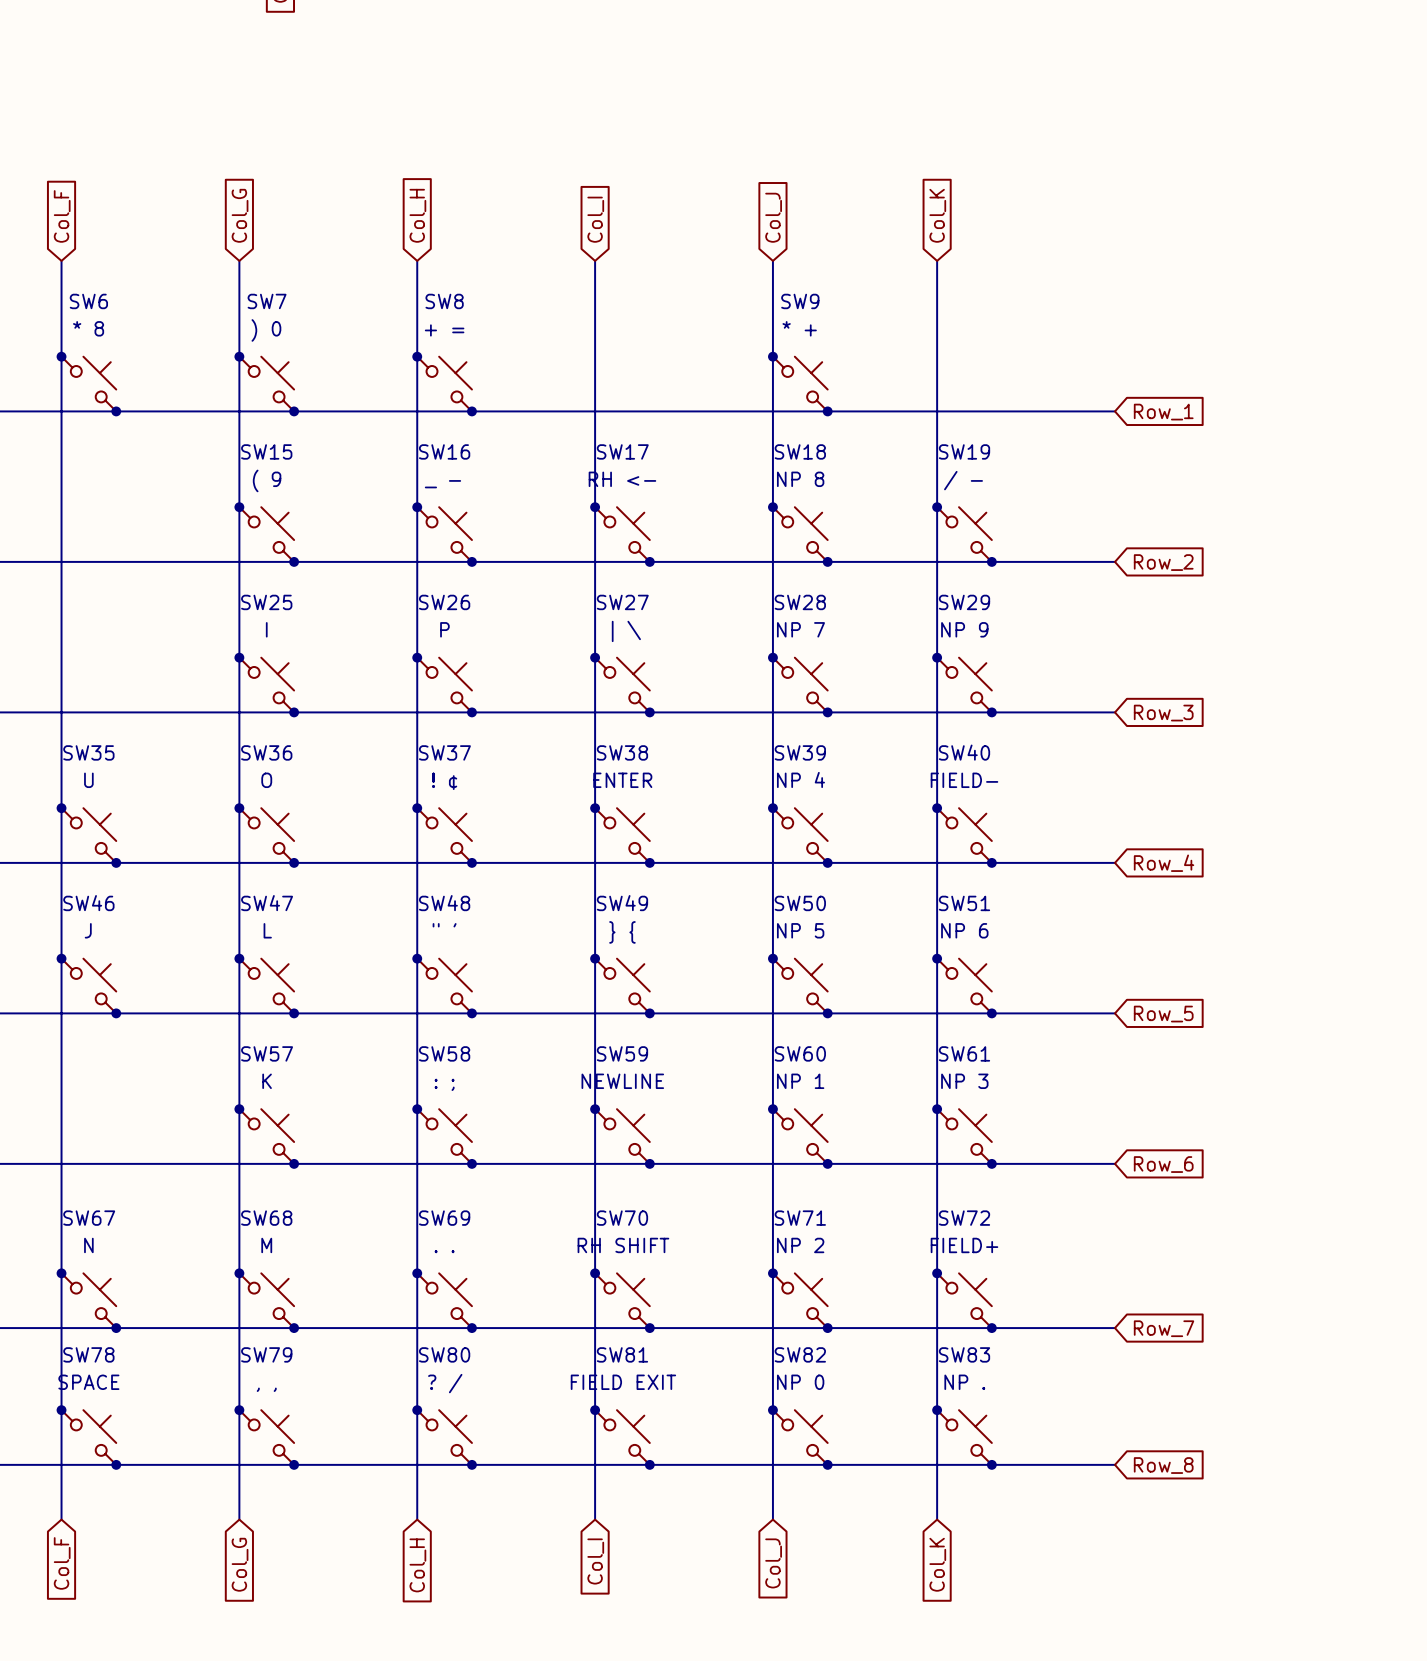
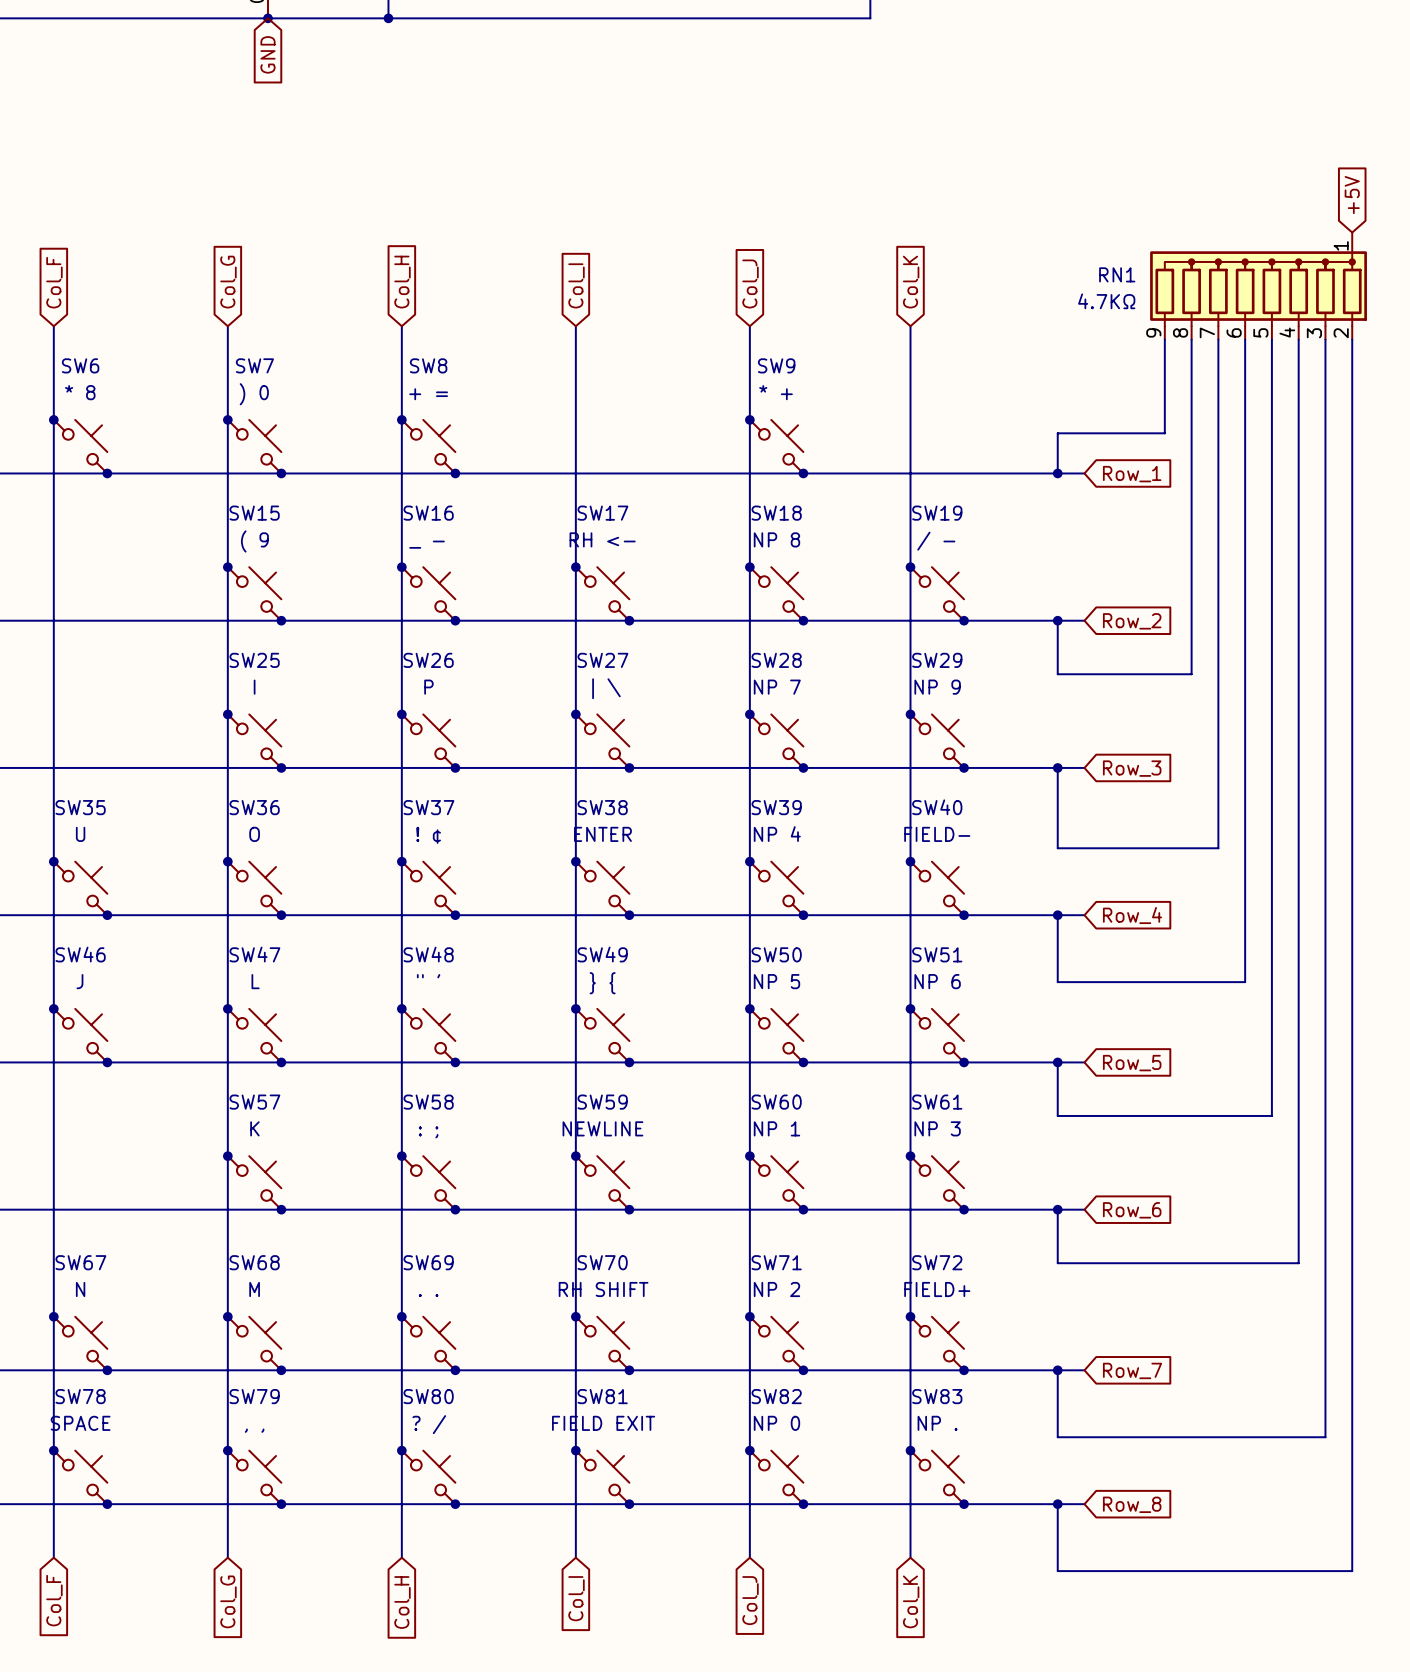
global label: none -> +5V (1352, 195)
RN1: none -> 4.7KΩ (1258, 286)
wire: none -> (1164, 339) (1164, 433) (1057, 433) (1057, 473)
wire: none -> (1191, 339) (1191, 674) (1057, 674) (1057, 620)
wire: none -> (1218, 339) (1218, 848) (1057, 848) (1057, 767)
wire: none -> (1245, 339) (1245, 982) (1057, 982) (1057, 915)
wire: none -> (1271, 339) (1271, 1115) (1057, 1115) (1057, 1062)
wire: none -> (1298, 339) (1298, 1263) (1057, 1263) (1057, 1209)
wire: none -> (1325, 339) (1325, 1437) (1057, 1437) (1057, 1370)
wire: none -> (1352, 339) (1352, 1571) (1057, 1571) (1057, 1504)
junction: none -> (1057, 473)
junction: none -> (1057, 620)
junction: none -> (1057, 767)
junction: none -> (1057, 915)
junction: none -> (1057, 1062)
junction: none -> (1057, 1209)
junction: none -> (1057, 1370)
junction: none -> (1057, 1504)

